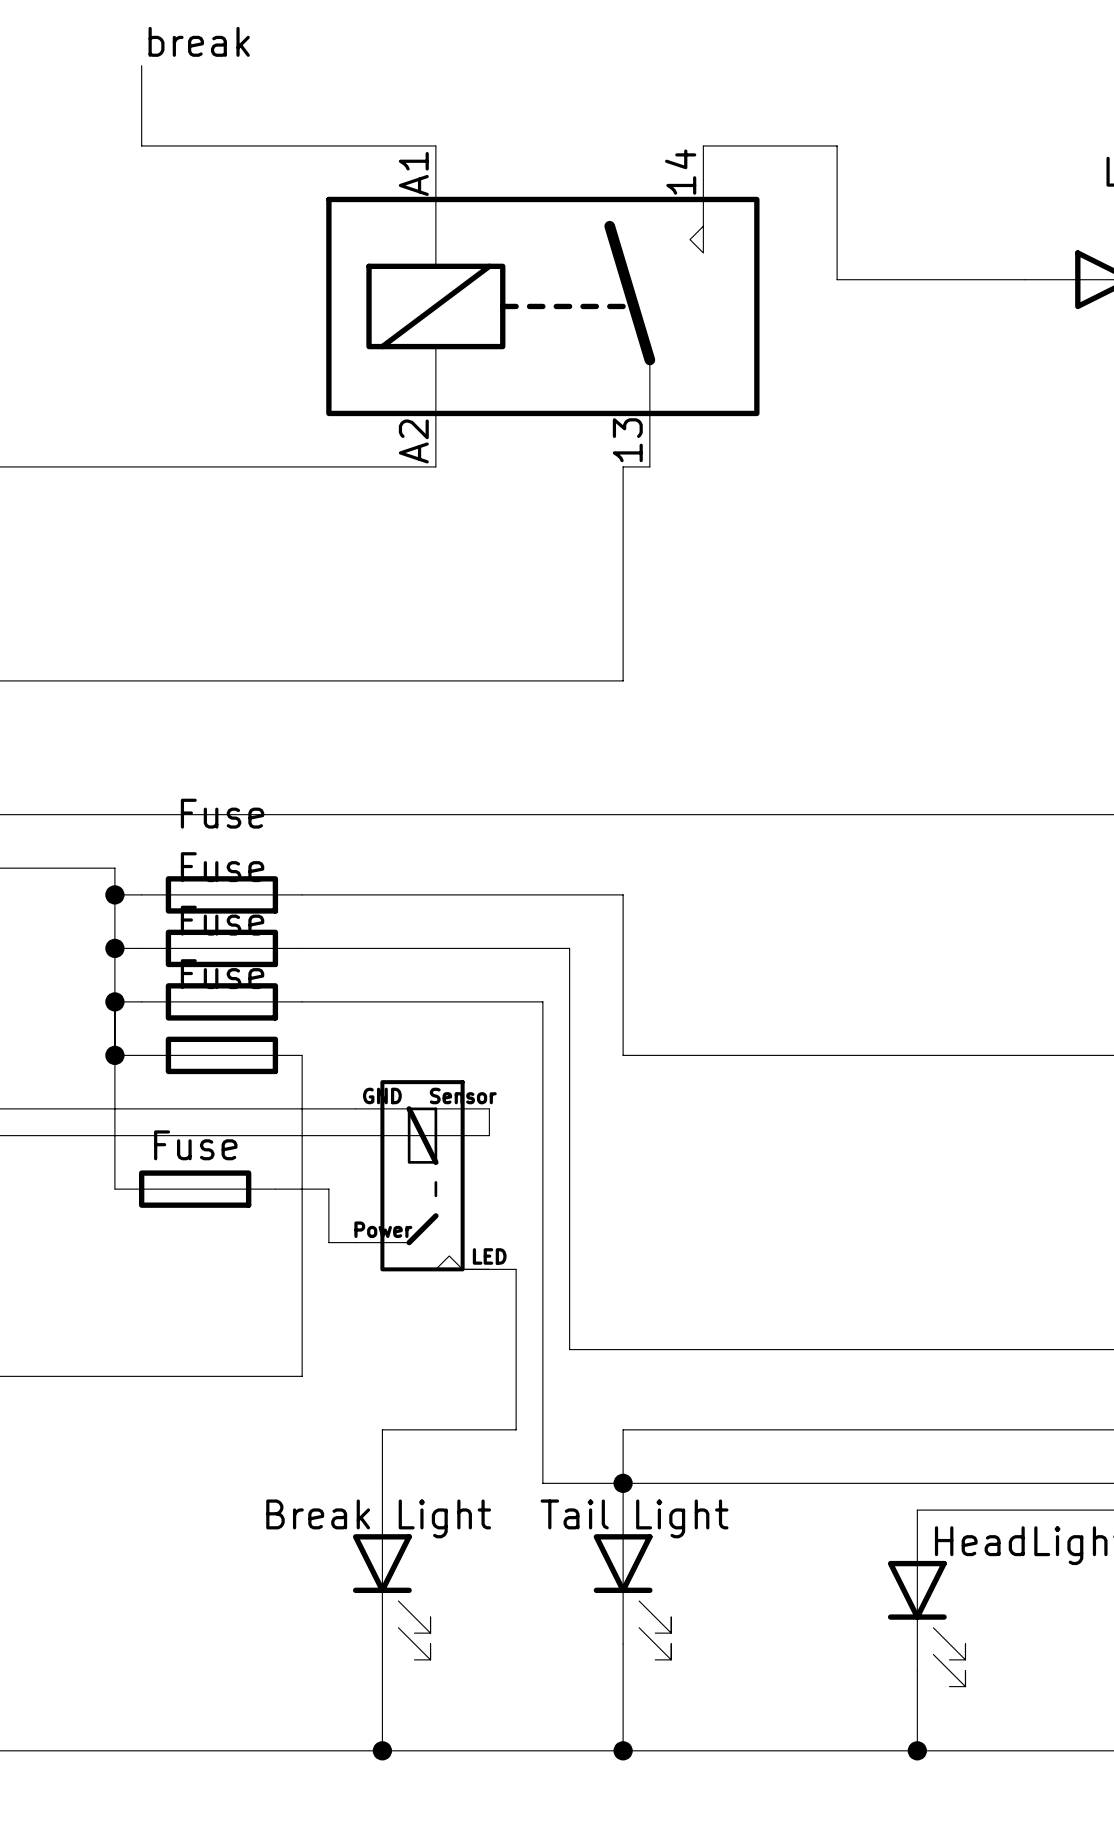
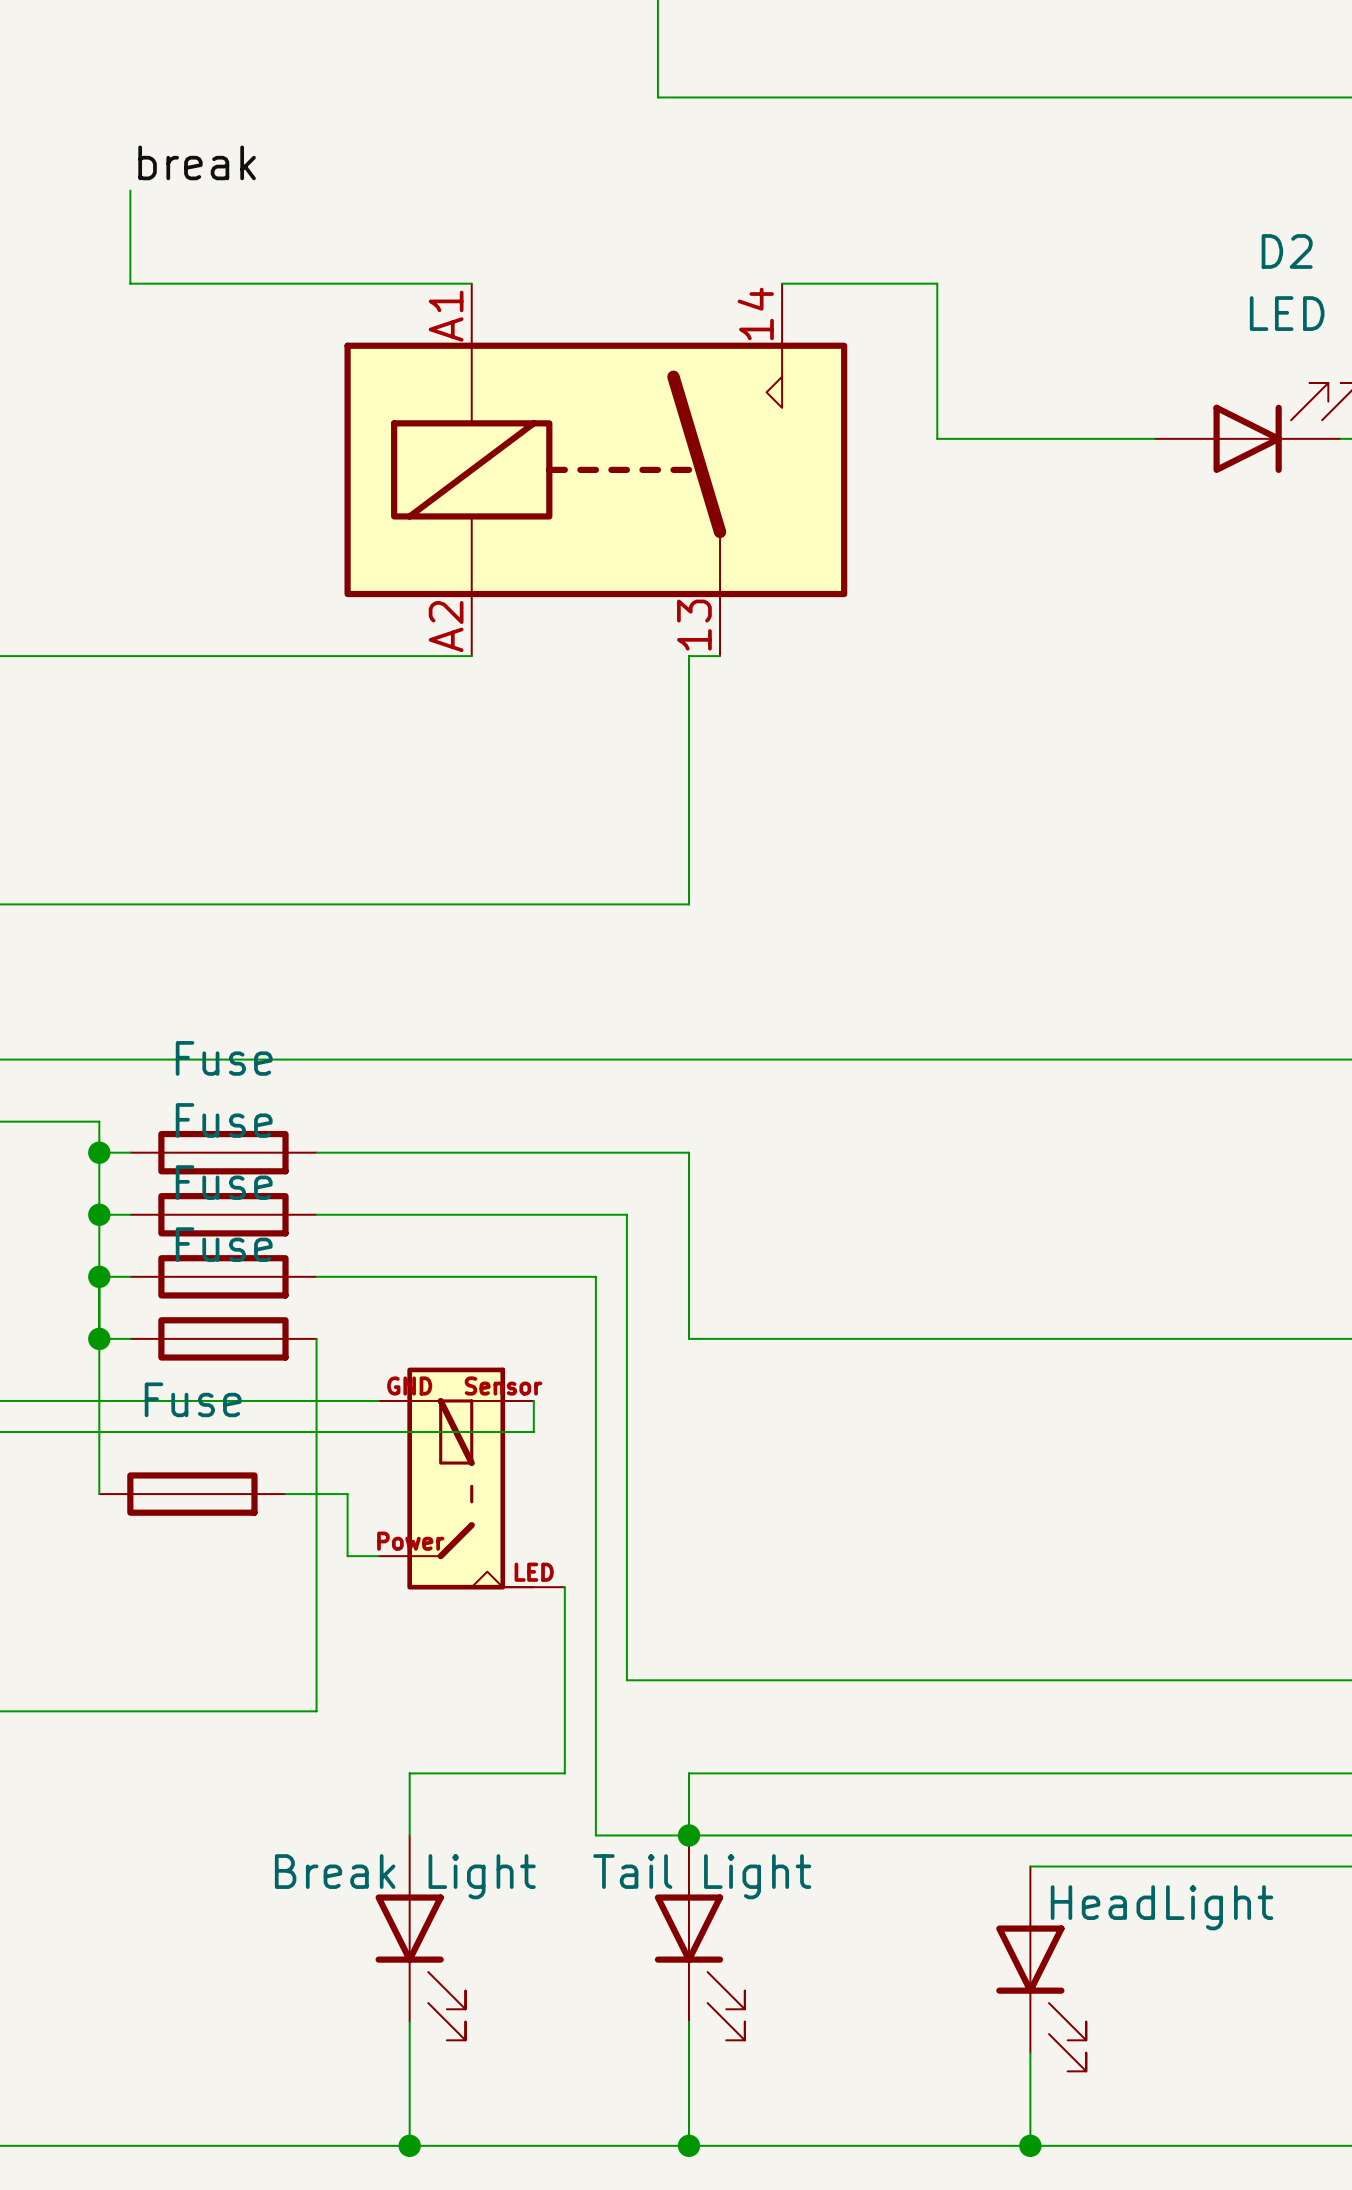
part value position: Fuse (195, 1145) -> Fuse (193, 1399)

